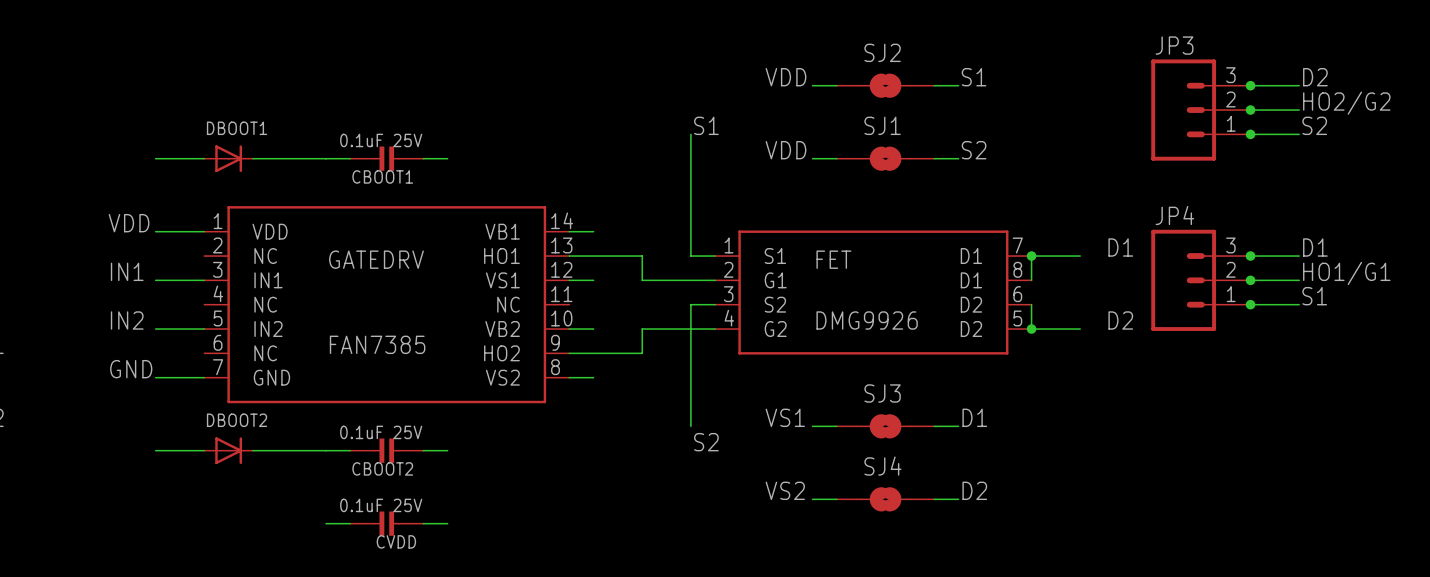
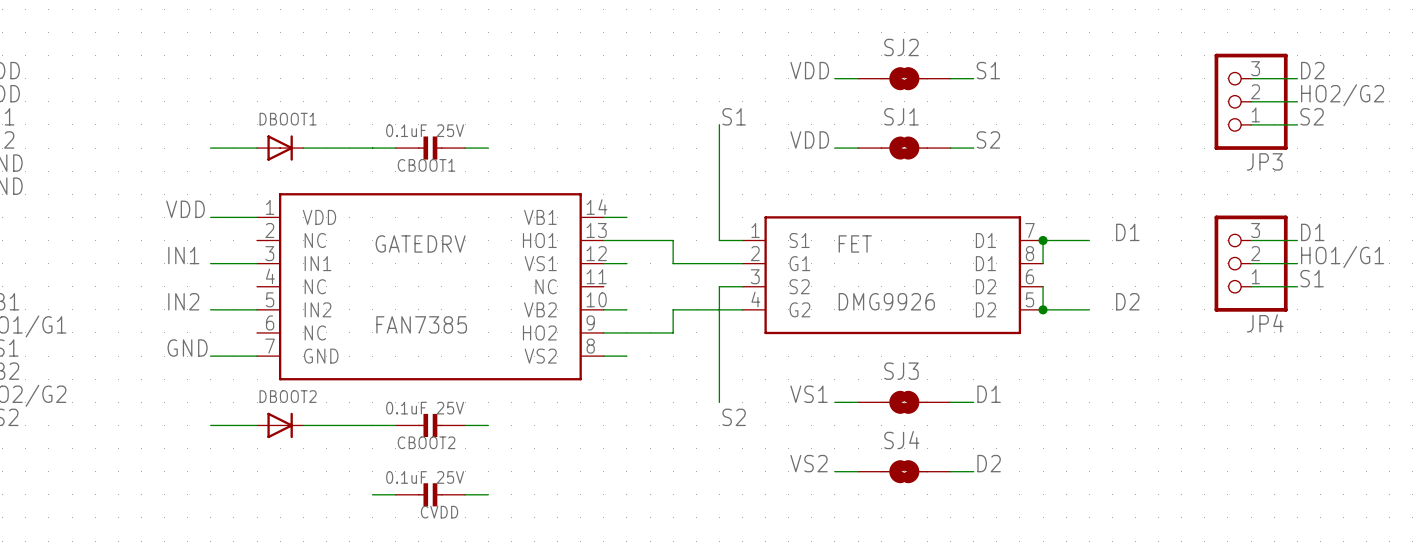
JP3 name position: JP3 (1174, 45) -> JP3 (1264, 161)
JP3 symbol: [1151, 59, 1251, 161] -> [1214, 53, 1288, 150]
junction: (1250, 85) -> none
junction: (1250, 110) -> none
junction: (1250, 134) -> none
JP4 name position: JP4 (1174, 215) -> JP4 (1265, 323)
JP4 symbol: [1151, 229, 1251, 331] -> [1214, 215, 1288, 312]
junction: (1250, 256) -> none
junction: (1250, 280) -> none
junction: (1250, 304) -> none

